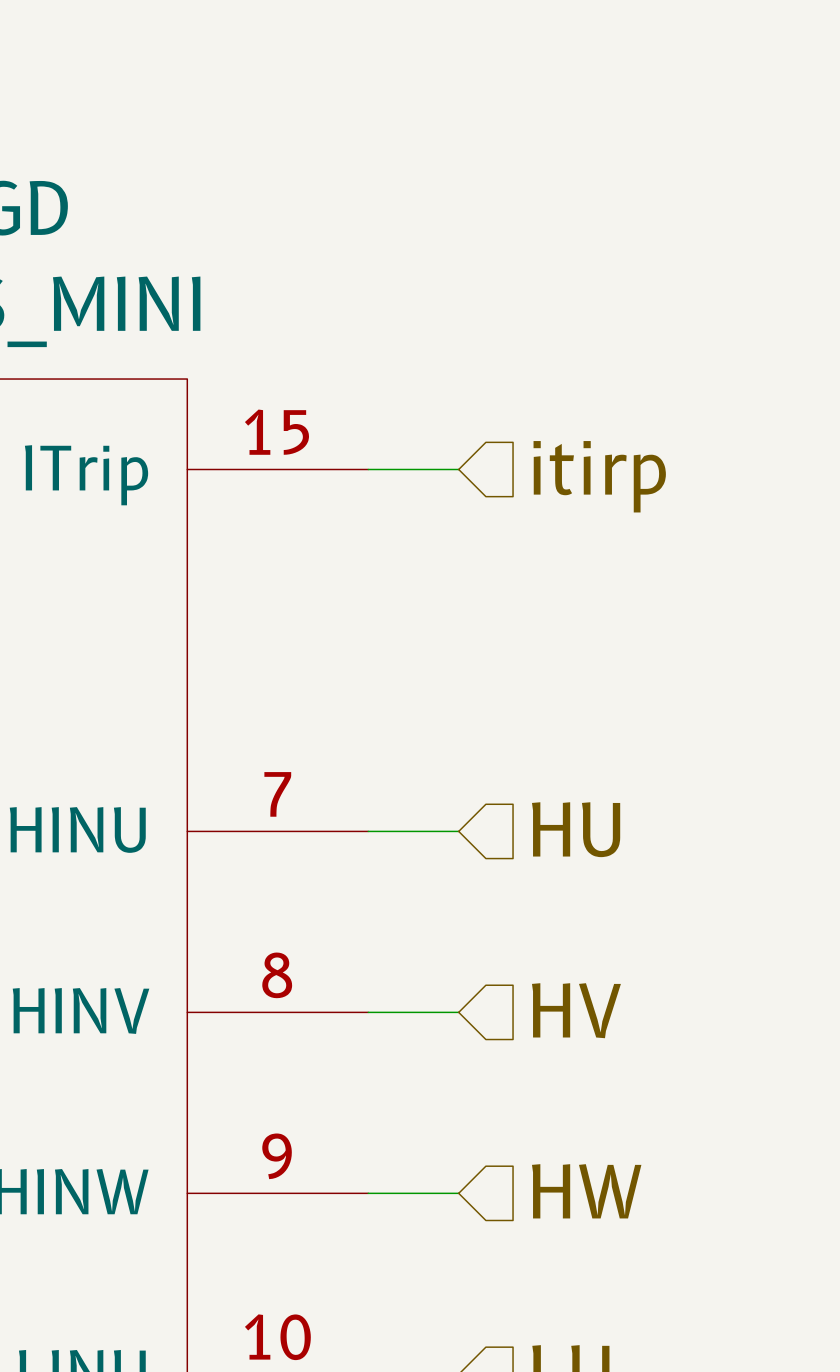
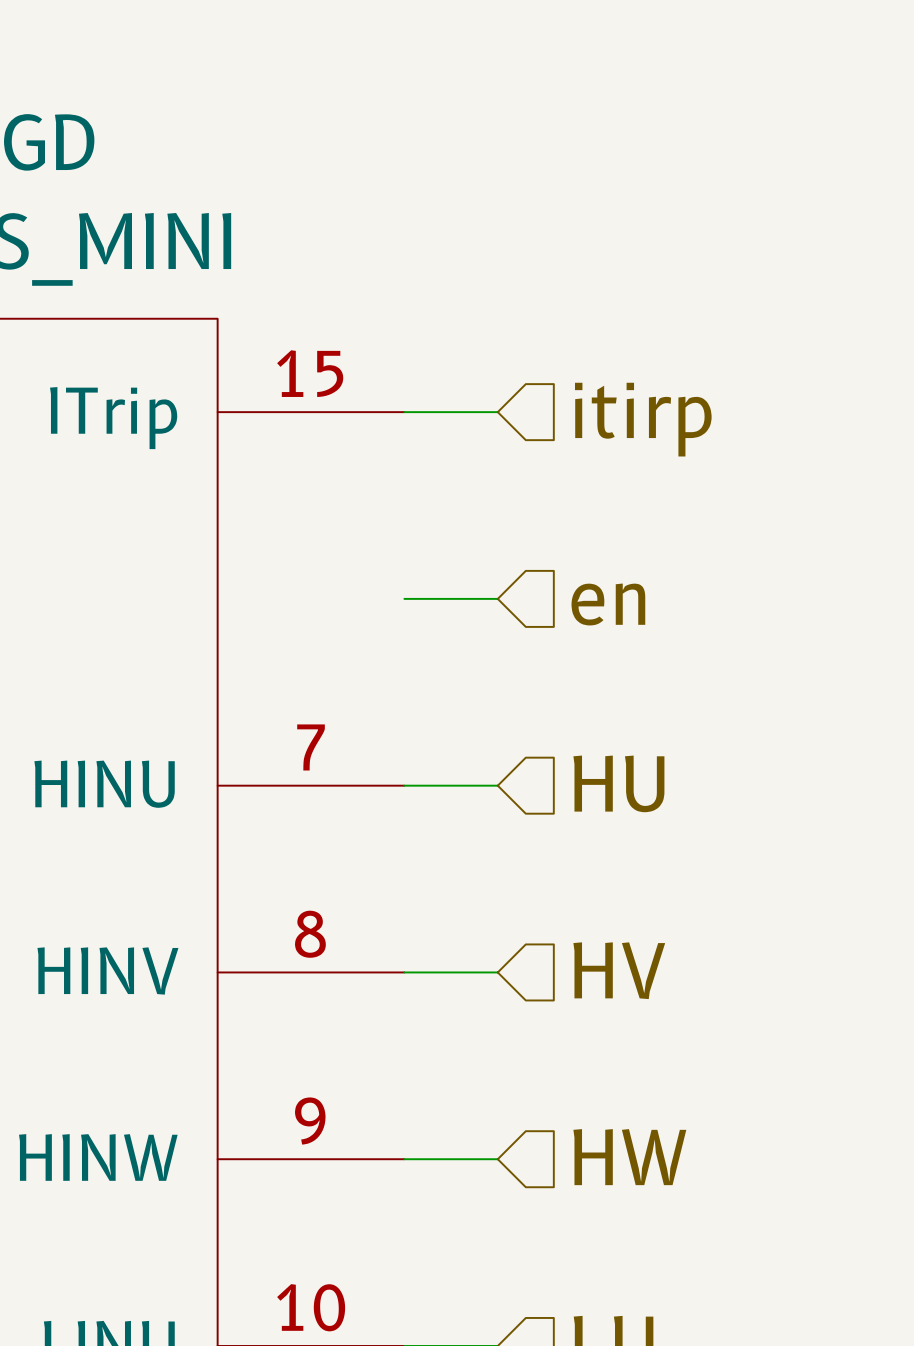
wire: none -> (404, 598) (497, 598)
hierarchical label: none -> en (608, 604)

